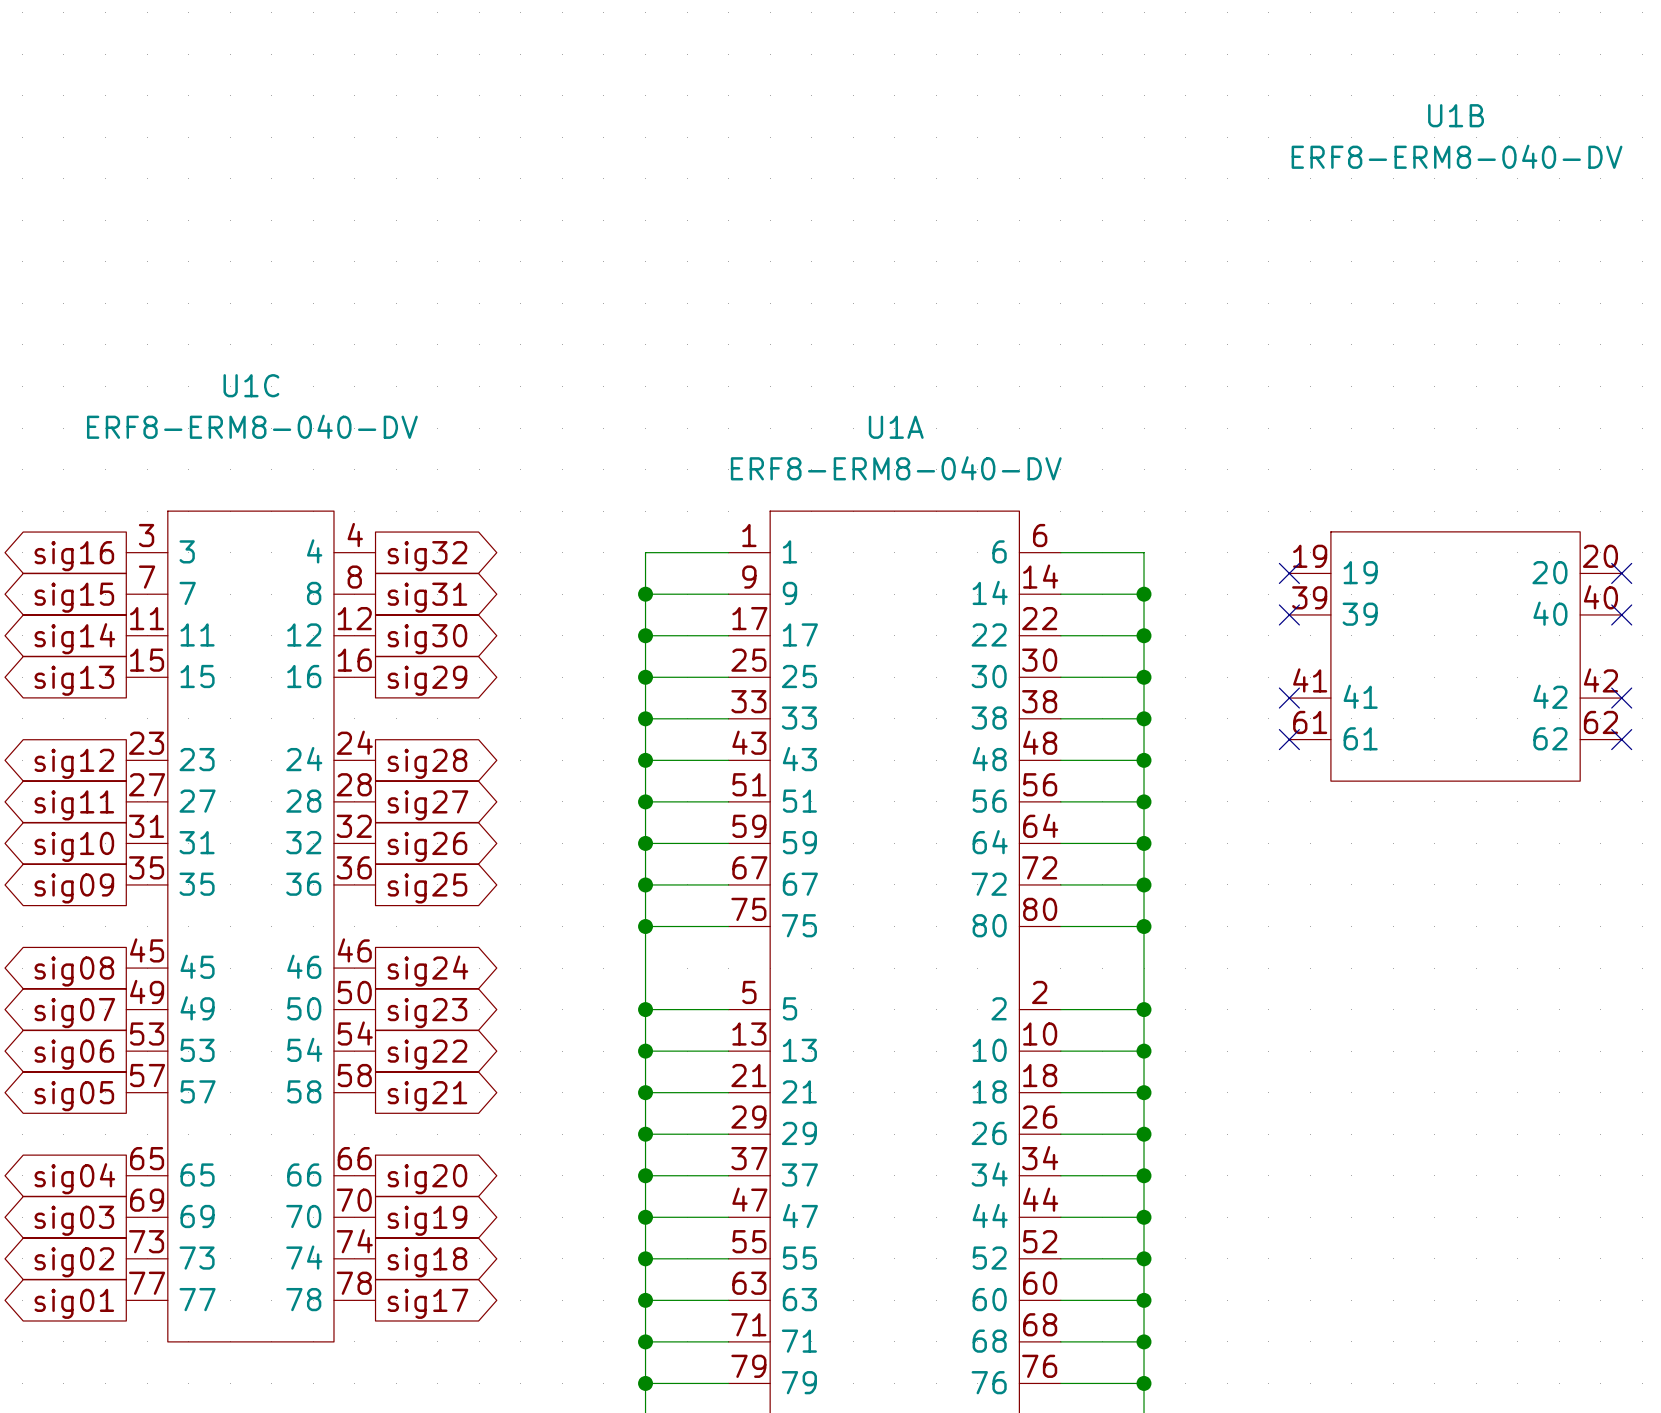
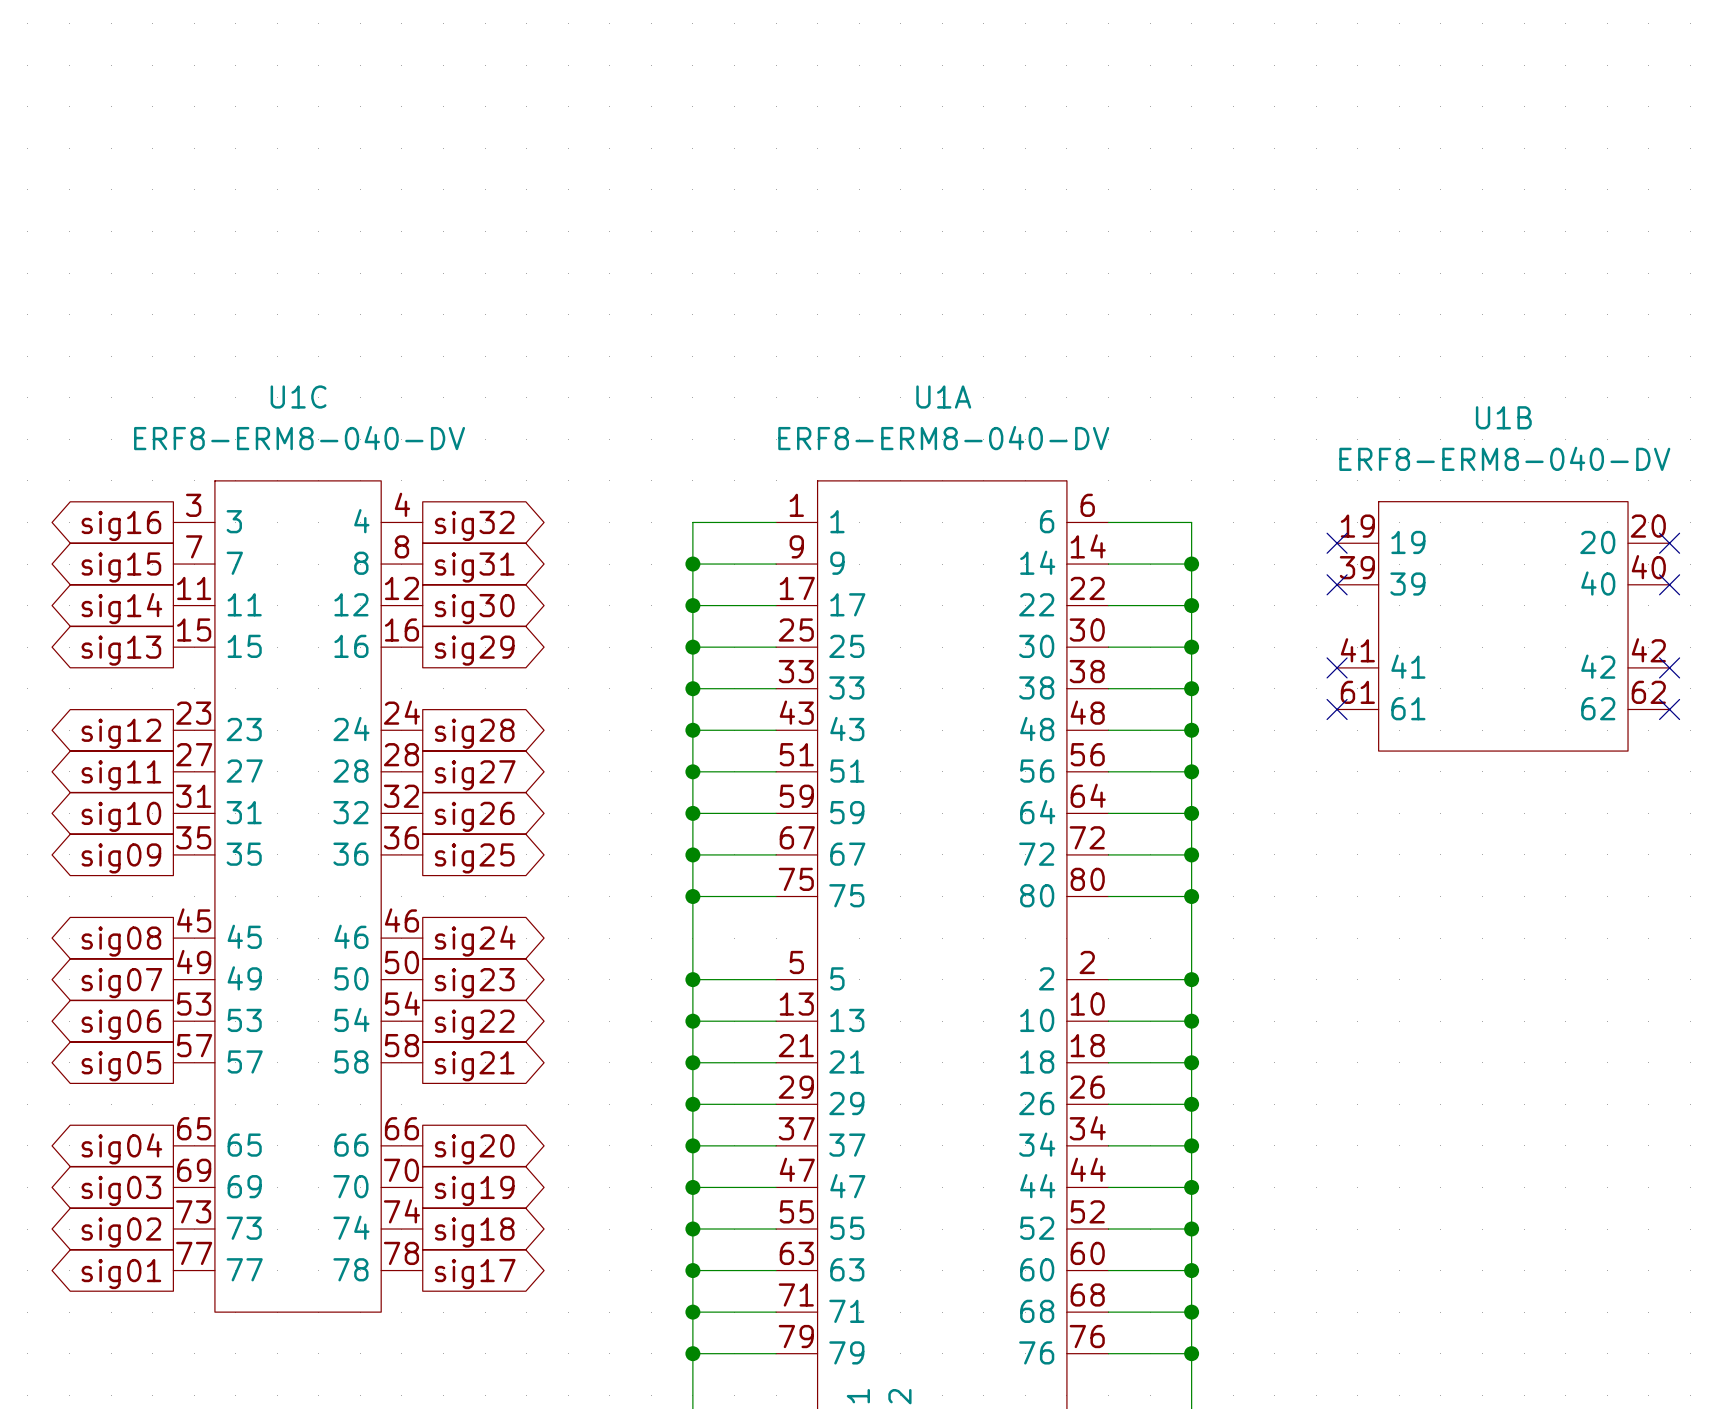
U1B name position: U1B (1456, 115) -> U1B (1503, 417)
U1B value position: ERF8-ERM8-040-DV (1457, 156) -> ERF8-ERM8-040-DV (1504, 458)
U1C name position: U1C (251, 385) -> U1C (298, 397)
U1C value position: ERF8-ERM8-040-DV (252, 426) -> ERF8-ERM8-040-DV (299, 438)

